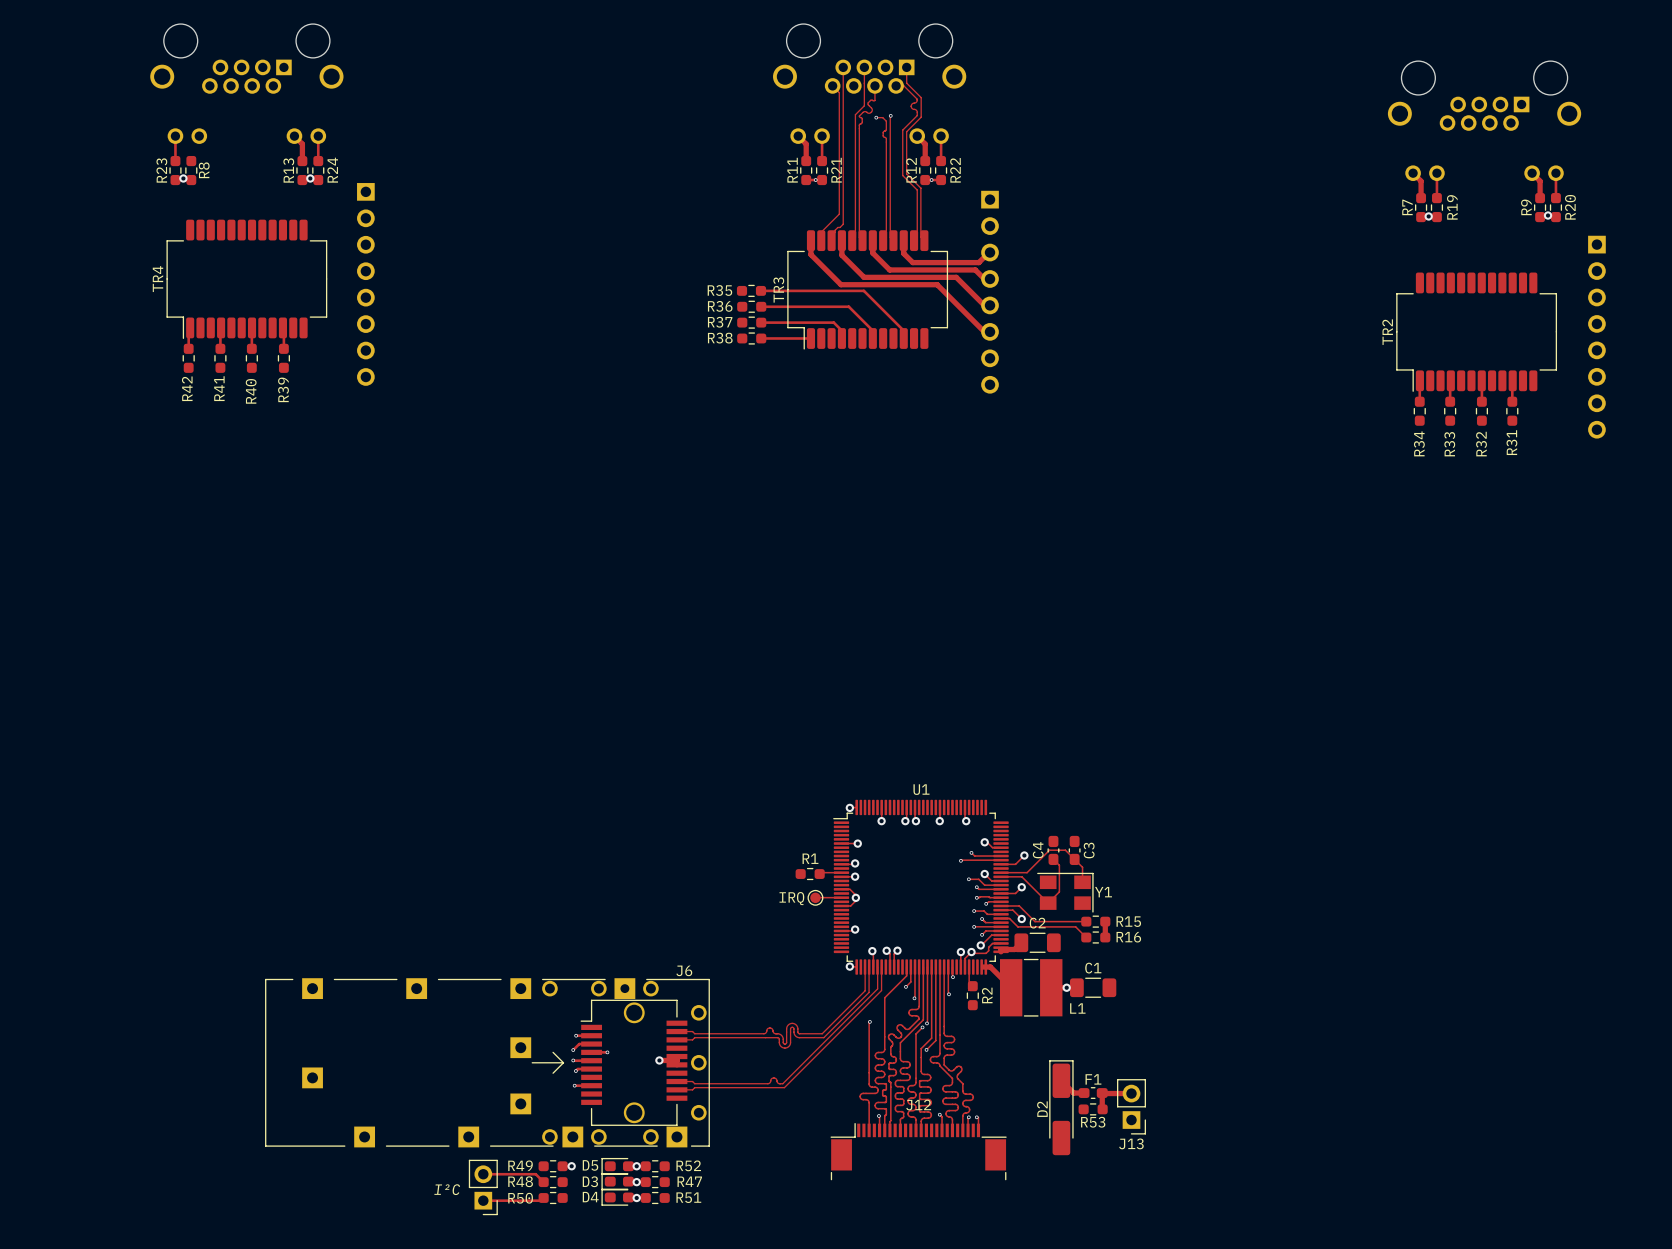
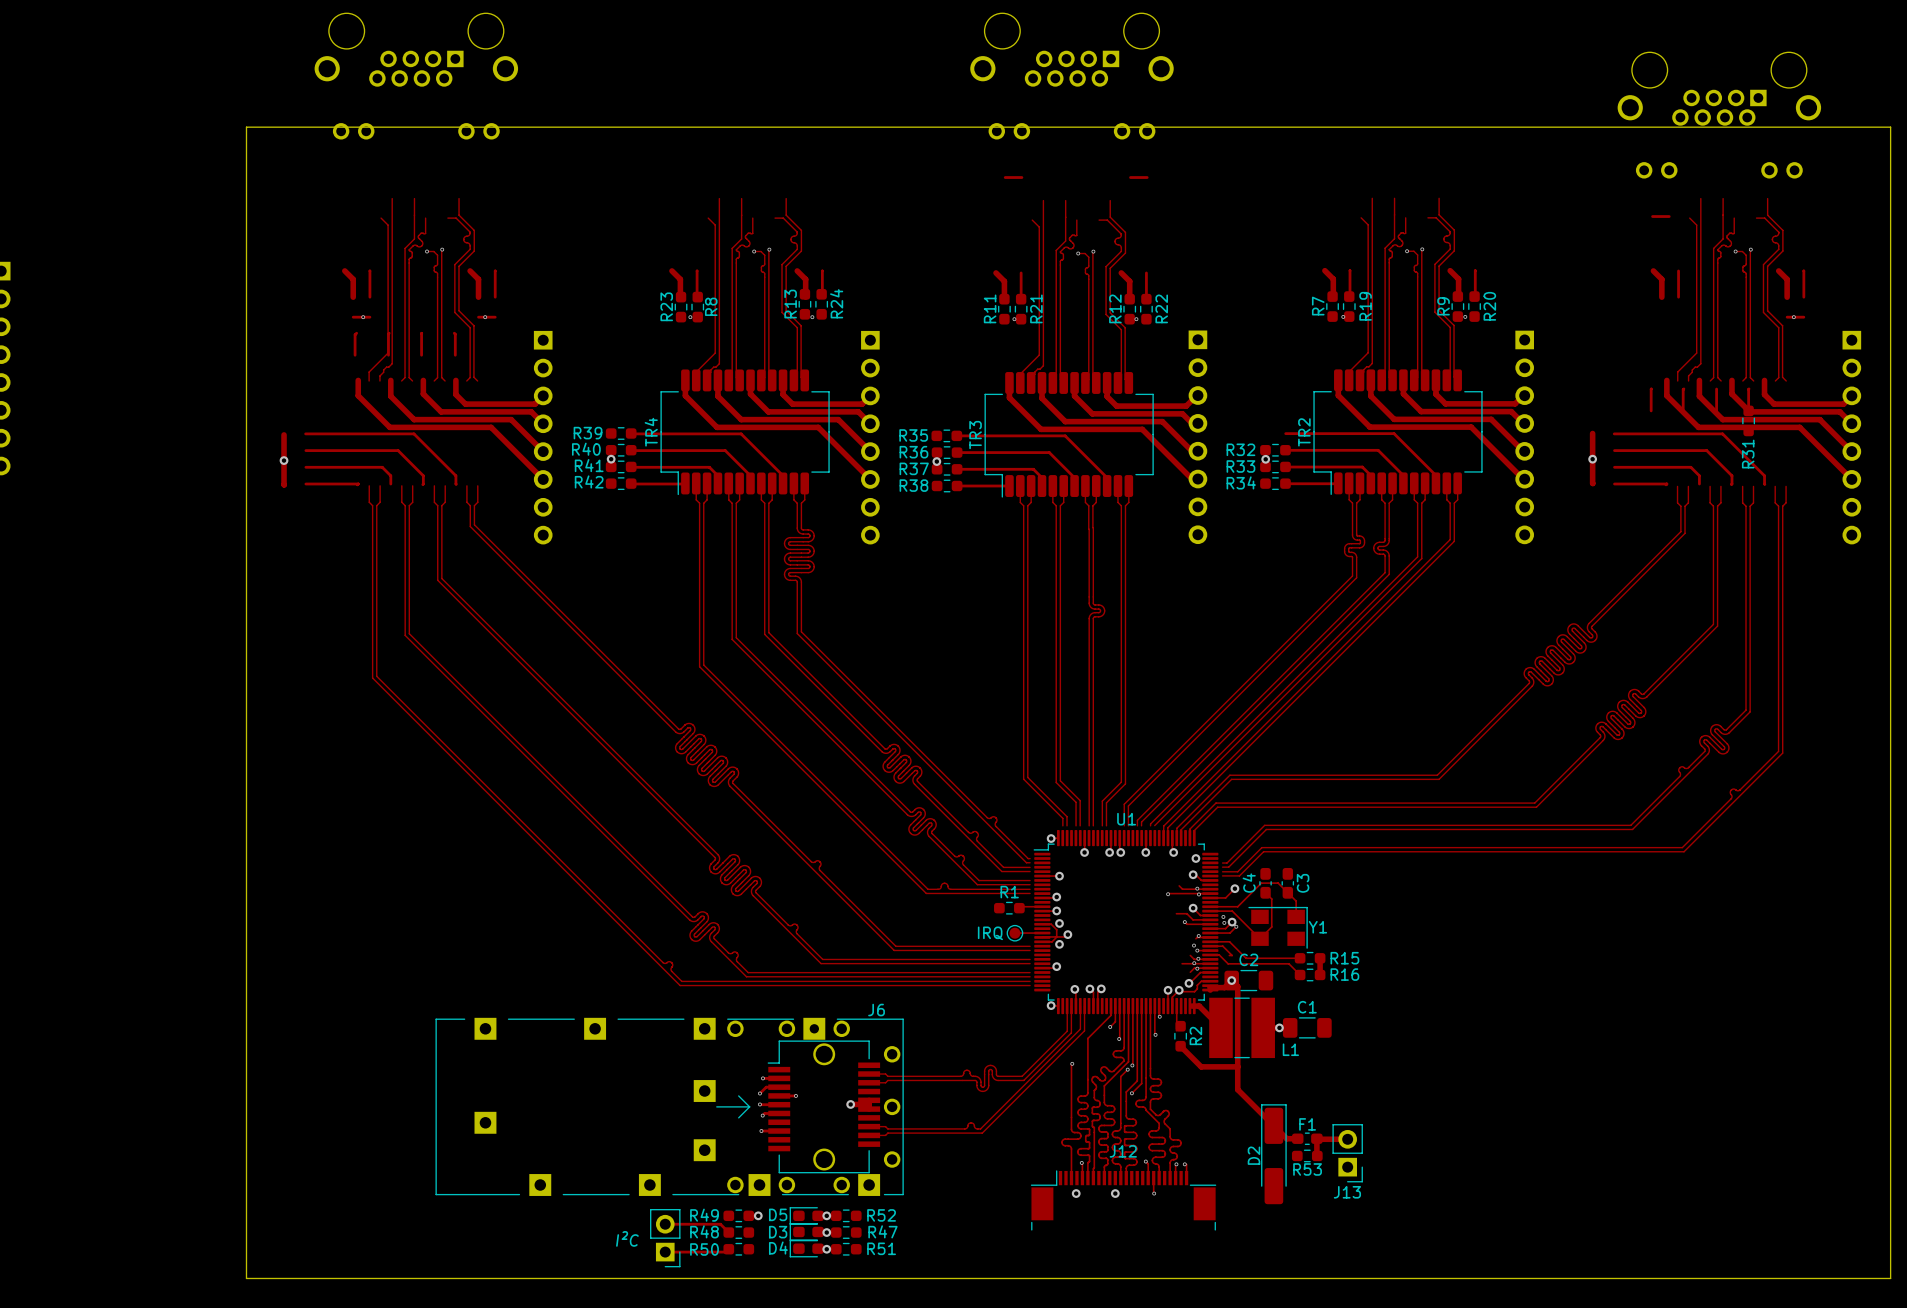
track: (843, 67) (843, 224) (835, 230) (831, 235) (831, 240) -> (1043, 200) (1043, 365) (1034, 372) (1031, 377) (1031, 382)
track: (864, 67) (864, 105) (855, 114) (855, 237) (852, 240) -> (1065, 200) (1065, 241) (1056, 250) (1056, 379) (1052, 382)
track: (906, 67) (906, 83) (921, 97) (921, 117) (906, 131) (906, 173) (920, 188) (920, 237) (924, 240) -> (1110, 200) (1110, 217) (1125, 232) (1125, 253) (1110, 268) (1110, 312) (1125, 327) (1125, 379) (1128, 382)
track: (832, 85) (839, 92) (839, 214) (821, 232) (821, 240) -> (1032, 220) (1039, 227) (1039, 355) (1020, 374) (1020, 382)
track: (874, 85) (874, 100) (870, 100) (867, 103) (871, 111) (869, 113) (863, 111) (859, 116) (862, 119) (862, 122) (859, 125) (859, 237) (862, 240) -> (1076, 220) (1076, 235) (1072, 235) (1069, 238) (1073, 246) (1070, 248) (1065, 247) (1060, 251) (1063, 254) (1063, 259) (1060, 261) (1060, 379) (1063, 382)
track: (896, 85) (903, 85) (917, 99) (911, 106) (916, 110) (917, 115) (902, 130) (902, 175) (917, 190) (917, 237) (914, 240) -> (1099, 220) (1107, 220) (1121, 234) (1115, 241) (1120, 246) (1121, 251) (1106, 266) (1106, 314) (1121, 329) (1121, 379) (1117, 382)
track: (890, 115) (890, 237) (893, 240) -> (1093, 251) (1092, 379) (1096, 382)
via: (890, 115) -> none
track: (876, 117) (882, 117) (886, 121) (886, 129) (883, 132) (883, 136) (886, 138) (886, 237) (883, 240) -> (1078, 253) (1085, 253) (1088, 257) (1088, 266) (1085, 269) (1085, 273) (1088, 275) (1088, 379) (1085, 382)
via: (876, 117) -> none
board edge: none -> (246, 127) (1890, 127) (1890, 1278) (246, 1278) (246, 127)
track: (175, 136) (175, 161) -> (369, 270) (369, 297)
track: (294, 136) (302, 144) (302, 161) -> (470, 270) (478, 279) (478, 297)
track: (318, 136) (318, 161) -> (495, 270) (495, 297)
track: (798, 136) (806, 144) (806, 161) -> (996, 272) (1004, 281) (1004, 299)
track: (822, 136) (822, 161) -> (1021, 272) (1021, 299)
track: (917, 136) (925, 144) (925, 161) -> (1121, 272) (1129, 281) (1129, 299)
track: (941, 136) (941, 161) -> (1146, 272) (1146, 299)
R23 position: (175, 170) -> (681, 307)
R8 position: (191, 170) -> (697, 307)
R13 position: (302, 170) -> (804, 304)
R24 position: (318, 170) -> (821, 304)
R11 position: (806, 170) -> (1004, 309)
R21 position: (822, 170) -> (1021, 309)
R12 position: (925, 170) -> (1129, 309)
R22 position: (941, 170) -> (1146, 309)
track: (1413, 173) (1421, 181) (1421, 198) -> (1653, 270) (1661, 279) (1661, 297)
track: (1436, 173) (1436, 198) -> (1678, 270) (1678, 297)
track: (1532, 173) (1540, 181) (1540, 198) -> (1778, 270) (1787, 279) (1787, 297)
track: (1555, 173) (1555, 198) -> (1803, 270) (1803, 297)
via: (183, 178) -> none
via: (310, 178) -> none
via: (815, 180) -> none
via: (931, 180) -> none
track: none -> (1372, 198) (1372, 363) (1363, 369) (1360, 375) (1360, 380)
track: none -> (1394, 198) (1394, 238) (1385, 248) (1385, 377) (1381, 380)
track: none -> (1439, 198) (1439, 214) (1454, 230) (1454, 250) (1439, 266) (1439, 310) (1454, 325) (1454, 377) (1457, 380)
track: none -> (392, 198) (392, 363) (383, 370) (379, 375) (379, 380)
track: none -> (414, 198) (414, 239) (405, 248) (405, 377) (401, 380)
track: none -> (459, 198) (459, 215) (474, 230) (474, 251) (458, 266) (458, 310) (473, 325) (473, 377) (477, 380)
track: none -> (719, 198) (719, 363) (710, 370) (707, 375) (707, 380)
track: none -> (741, 198) (741, 215)
track: none -> (786, 198) (786, 215) (801, 230) (801, 251) (786, 266) (786, 310) (801, 325) (801, 377) (804, 380)
track: none -> (1700, 198) (1700, 363) (1692, 370) (1688, 375) (1688, 380)
track: none -> (1723, 198) (1723, 239) (1713, 248) (1713, 377) (1710, 380)
track: none -> (1767, 198) (1767, 215) (1782, 230) (1782, 251) (1767, 266) (1767, 310) (1782, 325) (1782, 377) (1786, 380)
R7 position: (1421, 207) -> (1332, 306)
R19 position: (1436, 207) -> (1349, 306)
R9 position: (1540, 207) -> (1457, 306)
R20 position: (1555, 207) -> (1474, 306)
track: none -> (741, 215) (741, 239) (732, 248) (732, 377) (728, 380)
via: (1548, 215) -> none
via: (1428, 216) -> none
track: none -> (381, 218) (388, 225) (388, 353) (369, 372) (369, 380)
track: none -> (425, 218) (425, 233) (421, 233) (418, 236) (422, 245) (419, 246) (413, 245) (409, 249) (412, 252) (412, 257) (409, 259) (409, 377) (412, 380)
track: none -> (447, 218) (456, 218) (470, 232) (463, 239) (469, 244) (470, 249) (454, 264) (454, 312) (470, 327) (470, 377) (466, 380)
track: none -> (708, 218) (715, 225) (715, 353) (696, 372) (696, 380)
track: none -> (752, 218) (752, 233) (748, 233) (745, 236) (749, 245) (746, 246) (741, 245) (736, 249) (739, 252) (739, 257) (736, 259) (736, 377) (739, 380)
track: none -> (775, 218) (783, 218) (797, 232) (790, 239) (796, 244) (797, 249) (782, 264) (782, 312) (797, 327) (797, 377) (793, 380)
track: none -> (1361, 217) (1368, 224) (1368, 352) (1349, 371) (1349, 380)
track: none -> (1405, 217) (1405, 233) (1401, 232) (1398, 236) (1402, 244) (1399, 246) (1394, 245) (1389, 249) (1392, 252) (1392, 256) (1389, 259) (1389, 377) (1392, 380)
track: none -> (1427, 217) (1436, 217) (1450, 231) (1443, 239) (1449, 244) (1450, 249) (1434, 264) (1434, 312) (1450, 327) (1450, 377) (1446, 380)
track: none -> (1689, 218) (1696, 225) (1696, 353) (1677, 372) (1677, 380)
track: none -> (1734, 218) (1734, 233) (1730, 233) (1726, 236) (1731, 245) (1728, 246) (1722, 245) (1717, 249) (1720, 252) (1720, 257) (1717, 259) (1717, 377) (1721, 380)
track: none -> (1756, 218) (1764, 218) (1778, 232) (1772, 239) (1778, 244) (1778, 249) (1763, 264) (1763, 312) (1778, 327) (1778, 377) (1775, 380)
track: (810, 240) (810, 254) (841, 284) (937, 284) (986, 334) -> (1009, 382) (1009, 397) (1041, 429) (1142, 429) (1194, 481)
track: (841, 240) (841, 255) (864, 277) (956, 277) (986, 307) -> (1041, 382) (1041, 398) (1065, 421) (1162, 421) (1194, 453)
track: (872, 240) (872, 253) (889, 269) (975, 269) (986, 281) -> (1074, 382) (1074, 396) (1092, 413) (1182, 413) (1194, 425)
track: (903, 240) (903, 253) (912, 262) (978, 262) (986, 254) -> (1107, 382) (1107, 396) (1116, 406) (1186, 406) (1194, 397)
track: none -> (442, 249) (441, 377) (445, 380)
via: none -> (442, 249)
track: none -> (769, 249) (768, 377) (772, 380)
via: none -> (769, 249)
track: none -> (1422, 249) (1421, 377) (1425, 380)
via: none -> (1422, 249)
track: none -> (1750, 249) (1750, 377) (1753, 380)
via: none -> (1750, 249)
track: none -> (427, 251) (433, 251) (437, 255) (437, 264) (434, 267) (434, 271) (437, 273) (437, 377) (434, 380)
via: none -> (427, 251)
track: none -> (754, 251) (760, 251) (764, 255) (764, 264) (761, 267) (761, 271) (764, 273) (764, 377) (761, 380)
via: none -> (754, 251)
via: none -> (1093, 251)
track: none -> (1407, 251) (1413, 251) (1417, 255) (1417, 264) (1414, 267) (1414, 271) (1417, 273) (1417, 377) (1414, 380)
via: none -> (1407, 251)
track: none -> (1735, 251) (1742, 251) (1746, 255) (1746, 264) (1742, 267) (1743, 271) (1746, 273) (1746, 377) (1742, 380)
via: none -> (1735, 251)
via: none -> (1078, 253)
track: none -> (344, 270) (353, 279) (353, 297)
track: none -> (671, 270) (680, 279) (680, 297)
track: none -> (697, 270) (697, 297)
track: none -> (797, 270) (805, 279) (805, 297)
track: none -> (822, 270) (822, 297)
track: none -> (1324, 270) (1333, 279) (1333, 296)
track: none -> (1350, 270) (1350, 296)
track: none -> (1450, 270) (1458, 279) (1458, 296)
track: none -> (1475, 270) (1475, 296)
TR4 position: (246, 279) -> (745, 432)
part position: (365, 284) -> (543, 437)
TR3 position: (867, 289) -> (1069, 434)
R35 position: (751, 290) -> (946, 435)
track: (761, 290) (863, 290) (903, 330) (904, 338) -> (956, 435) (1065, 435) (1107, 477) (1107, 486)
part position: (990, 292) -> (1197, 437)
R36 position: (751, 306) -> (947, 452)
track: (761, 306) (848, 306) (872, 330) (872, 339) -> (957, 452) (1049, 452) (1074, 477) (1074, 486)
track: none -> (353, 317) (369, 317)
via: none -> (363, 317)
track: none -> (478, 317) (495, 317)
via: none -> (485, 317)
via: none -> (690, 317)
via: none -> (812, 317)
via: none -> (1343, 316)
via: none -> (1465, 316)
track: none -> (1787, 317) (1803, 317)
via: none -> (1793, 317)
via: none -> (1014, 319)
via: none -> (1136, 319)
R37 position: (751, 322) -> (947, 469)
track: (761, 322) (833, 322) (841, 330) (841, 338) -> (957, 469) (1033, 469) (1042, 477) (1042, 486)
TR2 position: (1476, 332) -> (1397, 432)
part position: (1596, 337) -> (1851, 437)
R38 position: (751, 338) -> (947, 486)
track: (761, 338) (810, 338) -> none
R42 rotation: 0° (188, 358) -> 90° clockwise (621, 483)
R42 position: (188, 358) -> (621, 483)
R41 rotation: 0° (220, 358) -> 90° clockwise (621, 466)
R41 position: (220, 358) -> (621, 466)
R40 rotation: 0° (251, 358) -> 90° clockwise (621, 450)
R40 position: (251, 358) -> (621, 450)
R39 rotation: 0° (283, 358) -> 90° clockwise (621, 433)
R39 position: (283, 358) -> (621, 433)
track: none -> (358, 380) (358, 395) (389, 427) (491, 427) (543, 479)
track: none -> (390, 380) (390, 396) (414, 419) (511, 419) (543, 451)
track: none -> (423, 380) (423, 394) (441, 411) (531, 411) (543, 423)
track: none -> (455, 380) (455, 394) (465, 404) (535, 404) (543, 395)
track: none -> (685, 380) (685, 395) (717, 427) (818, 427) (870, 479)
track: none -> (717, 380) (717, 396) (741, 419) (838, 419) (870, 451)
track: none -> (750, 380) (750, 394) (768, 411) (858, 411) (870, 423)
track: none -> (783, 380) (783, 394) (792, 404) (862, 404) (870, 395)
track: none -> (1338, 380) (1338, 395) (1369, 427) (1471, 427) (1523, 479)
track: none -> (1370, 380) (1370, 396) (1394, 419) (1491, 419) (1523, 451)
track: none -> (1403, 380) (1403, 393) (1421, 411) (1511, 411) (1523, 423)
track: none -> (1435, 380) (1435, 394) (1445, 403) (1515, 403) (1523, 395)
track: none -> (1666, 380) (1666, 395) (1698, 427) (1799, 427) (1851, 479)
track: none -> (1699, 380) (1699, 396) (1722, 419) (1819, 419) (1851, 451)
track: none -> (1731, 380) (1731, 394) (1749, 411) (1839, 411) (1851, 423)
track: none -> (1764, 380) (1764, 394) (1774, 404) (1843, 404) (1851, 395)
R34 rotation: 0° (1419, 411) -> 90° clockwise (1275, 483)
R34 position: (1419, 411) -> (1275, 483)
R33 rotation: 0° (1450, 411) -> 90° clockwise (1275, 466)
R33 position: (1450, 411) -> (1275, 466)
R32 rotation: 0° (1481, 411) -> 90° clockwise (1275, 450)
R32 position: (1481, 411) -> (1275, 450)
track: none -> (305, 433) (413, 433) (455, 475) (456, 484)
track: none -> (632, 433) (741, 433) (783, 475) (783, 484)
track: none -> (1285, 433) (1394, 433) (1436, 475) (1436, 484)
track: none -> (1592, 433) (1592, 483)
track: none -> (1614, 433) (1722, 433) (1764, 475) (1764, 484)
track: none -> (284, 434) (284, 485)
part: none -> (1524, 437)
part: none -> (870, 437)
track: none -> (305, 450) (398, 450) (423, 475) (422, 484)
track: none -> (633, 450) (725, 450) (750, 475) (749, 484)
track: none -> (1285, 450) (1378, 450) (1403, 475) (1402, 484)
track: none -> (1614, 450) (1706, 450) (1731, 475) (1731, 484)
via: none -> (611, 459)
via: none -> (1265, 459)
via: none -> (1592, 459)
via: none -> (284, 460)
via: none -> (936, 461)
track: none -> (305, 467) (382, 467) (390, 475) (390, 484)
track: none -> (633, 467) (709, 467) (717, 475) (717, 484)
track: none -> (1285, 467) (1362, 467) (1370, 475) (1370, 483)
track: none -> (1614, 467) (1690, 467) (1699, 475) (1699, 484)
track: none -> (696, 483) (696, 499) (699, 503) (699, 666) (926, 893) (1030, 893)
track: none -> (707, 483) (707, 499) (703, 503) (703, 665) (928, 889) (939, 889) (944, 883) (950, 889) (1030, 889)
track: none -> (728, 483) (728, 499) (732, 503) (732, 639) (907, 814) (912, 816) (920, 812) (920, 814) (909, 826) (911, 833) (917, 834) (931, 823) (927, 831) (928, 836) (977, 884) (1030, 884)
track: none -> (739, 483) (739, 499) (736, 503) (736, 637) (910, 811) (918, 807) (923, 809) (924, 815) (913, 828) (913, 830) (927, 819) (933, 820) (936, 825) (932, 833) (954, 856) (963, 856) (963, 864) (979, 880) (1030, 880)
track: none -> (761, 483) (761, 499) (764, 503) (764, 634) (881, 751) (886, 753) (895, 749) (895, 751) (883, 763) (885, 770) (891, 771) (903, 759) (906, 759) (906, 762) (894, 774) (896, 781) (902, 782) (917, 770) (913, 778) (914, 783) (1001, 871) (1030, 871)
track: none -> (772, 483) (772, 499) (768, 503) (768, 632) (885, 748) (892, 744) (898, 746) (899, 752) (887, 765) (887, 767) (890, 767) (902, 755) (909, 757) (910, 763) (898, 776) (898, 778) (901, 778) (912, 767) (919, 767) (921, 772) (917, 781) (968, 832) (977, 832) (977, 841) (1003, 867) (1030, 867)
track: none -> (793, 483) (793, 499) (797, 503) (797, 529) (800, 533) (810, 535) (808, 537) (788, 537) (784, 542) (788, 549) (810, 551) (808, 553) (788, 553) (784, 558) (788, 564) (810, 566) (808, 568) (788, 568) (784, 573) (787, 579) (797, 581) (797, 633) (1026, 862) (1030, 862)
track: none -> (804, 483) (804, 499) (801, 503) (801, 528) (811, 531) (813, 537) (809, 541) (790, 541) (788, 543) (790, 545) (809, 545) (814, 550) (809, 556) (788, 558) (790, 560) (809, 560) (814, 565) (809, 572) (788, 574) (789, 576) (798, 577) (801, 580) (801, 631) (987, 817) (995, 817) (995, 826) (1030, 858)
track: none -> (1285, 483) (1337, 484)
track: none -> (1349, 483) (1349, 499) (1352, 503) (1352, 536) (1354, 539) (1360, 540) (1359, 543) (1348, 543) (1344, 547) (1345, 554) (1352, 557) (1352, 576) (1124, 804) (1124, 825)
track: none -> (1360, 483) (1360, 499) (1356, 503) (1356, 535) (1363, 537) (1364, 543) (1361, 547) (1348, 548) (1349, 552) (1354, 553) (1356, 556) (1356, 577) (1128, 806) (1128, 825)
track: none -> (1381, 483) (1381, 499) (1385, 503) (1385, 540) (1376, 543) (1373, 548) (1376, 553) (1384, 555) (1385, 572) (1137, 820) (1137, 825)
track: none -> (1392, 483) (1392, 499) (1389, 503) (1389, 542) (1386, 545) (1377, 548) (1388, 553) (1389, 574) (1141, 822) (1141, 825)
track: none -> (1414, 483) (1414, 499) (1417, 503) (1417, 556) (1150, 825)
track: none -> (1425, 483) (1425, 499) (1421, 503) (1421, 558) (1154, 825)
track: none -> (1446, 483) (1446, 499) (1450, 503) (1450, 539) (1163, 826) (1163, 831)
track: none -> (1457, 483) (1457, 499) (1454, 503) (1454, 541) (1167, 827) (1167, 831)
track: none -> (305, 484) (357, 484)
track: none -> (633, 484) (684, 484)
track: none -> (1614, 484) (1666, 484)
track: none -> (369, 485) (369, 502) (372, 505) (372, 678) (680, 985) (1030, 985)
track: none -> (380, 485) (380, 502) (376, 505) (376, 676) (662, 962) (671, 962) (671, 970) (681, 981) (1030, 981)
track: none -> (401, 485) (401, 502) (405, 505) (405, 635) (689, 919) (695, 921) (703, 916) (703, 918) (690, 932) (692, 939) (699, 940) (714, 927) (714, 929) (709, 935) (710, 940) (746, 976) (1030, 976)
track: none -> (412, 485) (412, 502) (409, 505) (409, 633) (692, 916) (700, 912) (706, 913) (707, 920) (694, 934) (694, 936) (710, 923) (716, 923) (719, 929) (714, 938) (728, 953) (737, 953) (736, 961) (748, 972) (1030, 972)
track: none -> (434, 485) (434, 502) (437, 505) (437, 580) (714, 857) (709, 866) (711, 872) (718, 873) (732, 859) (734, 859) (735, 861) (721, 876) (722, 882) (728, 884) (743, 870) (745, 870) (746, 872) (731, 887) (733, 894) (740, 894) (756, 880) (757, 883) (751, 890) (752, 895) (821, 963) (1030, 963)
track: none -> (445, 485) (445, 502) (441, 505) (441, 578) (717, 854) (719, 860) (714, 869) (716, 869) (731, 855) (737, 856) (739, 863) (724, 877) (725, 880) (727, 880) (742, 866) (748, 867) (749, 874) (735, 888) (736, 891) (752, 877) (759, 877) (761, 883) (755, 892) (788, 925) (797, 925) (796, 933) (822, 959) (1030, 959)
track: none -> (466, 485) (466, 502) (470, 505) (470, 526) (675, 731) (681, 733) (688, 727) (690, 728) (676, 744) (677, 751) (684, 753) (698, 738) (701, 739) (701, 741) (687, 756) (688, 762) (695, 764) (709, 749) (712, 749) (712, 752) (698, 767) (699, 773) (705, 774) (720, 760) (723, 760) (723, 763) (708, 777) (710, 784) (716, 785) (731, 771) (733, 771) (728, 780) (730, 786) (894, 950) (1030, 950)
track: none -> (477, 485) (477, 502) (474, 505) (474, 524) (678, 728) (687, 723) (693, 725) (694, 731) (680, 746) (680, 749) (682, 749) (697, 734) (704, 736) (705, 742) (691, 757) (691, 759) (693, 760) (708, 745) (715, 747) (716, 753) (701, 768) (702, 770) (704, 771) (719, 756) (725, 757) (727, 764) (712, 779) (713, 781) (715, 781) (730, 767) (736, 768) (738, 774) (733, 783) (811, 861) (819, 861) (820, 870) (895, 946) (1030, 946)
track: none -> (957, 486) (1008, 486)
track: none -> (1020, 486) (1020, 502) (1023, 505) (1023, 779) (1062, 818) (1062, 825)
track: none -> (1031, 486) (1031, 502) (1027, 505) (1027, 777) (1067, 816) (1067, 825)
track: none -> (1052, 486) (1052, 502) (1056, 505) (1056, 782) (1076, 802) (1076, 825)
track: none -> (1063, 486) (1063, 502) (1060, 505) (1060, 780) (1080, 800) (1080, 825)
track: none -> (1085, 486) (1085, 502) (1088, 505) (1089, 603) (1092, 608) (1100, 610) (1091, 613) (1089, 618) (1089, 825)
track: none -> (1096, 486) (1096, 502) (1092, 505) (1093, 603) (1101, 605) (1104, 610) (1102, 615) (1093, 618) (1093, 825)
track: none -> (1117, 486) (1117, 502) (1121, 505) (1121, 782) (1102, 801) (1102, 825)
track: none -> (1128, 486) (1128, 502) (1125, 505) (1125, 783) (1106, 802) (1106, 825)
track: none -> (1677, 486) (1677, 502) (1680, 506) (1680, 531) (1588, 623) (1587, 628) (1592, 637) (1576, 624) (1569, 626) (1568, 632) (1581, 646) (1581, 648) (1565, 635) (1558, 636) (1557, 643) (1570, 659) (1568, 659) (1554, 646) (1548, 646) (1546, 654) (1559, 670) (1557, 670) (1544, 657) (1537, 657) (1535, 665) (1548, 680) (1546, 681) (1533, 668) (1526, 668) (1524, 674) (1529, 683) (1437, 775) (1229, 775) (1176, 828) (1176, 831)
track: none -> (1688, 486) (1688, 502) (1685, 506) (1685, 533) (1591, 626) (1596, 634) (1595, 639) (1588, 641) (1574, 628) (1572, 628) (1572, 630) (1585, 644) (1584, 650) (1577, 652) (1563, 639) (1561, 639) (1561, 641) (1574, 655) (1573, 661) (1566, 663) (1550, 650) (1550, 652) (1563, 666) (1562, 672) (1555, 674) (1539, 661) (1539, 663) (1552, 677) (1552, 683) (1544, 685) (1529, 672) (1533, 680) (1532, 685) (1439, 779) (1231, 779) (1181, 831)
track: none -> (1710, 486) (1710, 502) (1713, 506) (1713, 624) (1643, 694) (1635, 689) (1629, 691) (1629, 697) (1641, 710) (1641, 712) (1638, 713) (1626, 700) (1619, 701) (1618, 708) (1630, 723) (1627, 724) (1615, 711) (1609, 712) (1607, 719) (1619, 734) (1616, 734) (1604, 722) (1598, 723) (1595, 728) (1600, 737) (1534, 803) (1215, 803) (1190, 829) (1190, 831)
track: none -> (1720, 486) (1720, 502) (1717, 506) (1717, 626) (1646, 697) (1641, 698) (1633, 694) (1633, 696) (1645, 709) (1644, 715) (1637, 717) (1622, 704) (1622, 707) (1634, 720) (1633, 726) (1626, 727) (1611, 715) (1611, 718) (1623, 730) (1622, 737) (1615, 738) (1600, 726) (1604, 734) (1603, 739) (1536, 807) (1217, 807) (1194, 831)
track: none -> (1742, 486) (1742, 502) (1746, 506) (1746, 710) (1726, 729) (1717, 724) (1711, 727) (1711, 733) (1724, 746) (1724, 749) (1721, 749) (1708, 736) (1701, 736) (1699, 742) (1704, 751) (1688, 768) (1679, 768) (1679, 776) (1630, 825) (1264, 825) (1227, 863) (1222, 863)
track: none -> (1753, 486) (1753, 502) (1750, 506) (1750, 711) (1728, 733) (1723, 734) (1717, 729) (1715, 729) (1728, 745) (1727, 752) (1720, 753) (1704, 740) (1709, 748) (1708, 753) (1632, 829) (1266, 829) (1228, 867) (1222, 867)
track: none -> (1775, 486) (1775, 502) (1778, 506) (1778, 751) (1739, 790) (1731, 790) (1731, 798) (1682, 847) (1261, 847) (1237, 871) (1222, 871)
track: none -> (1786, 486) (1786, 502) (1782, 506) (1782, 753) (1684, 851) (1263, 851) (1239, 875) (1222, 875)
via: none -> (1195, 858)
via: (971, 852) -> none
via: none -> (1197, 888)
via: none -> (1198, 894)
via: (968, 879) -> none
via: none -> (1223, 916)
via: none -> (1059, 923)
via: none -> (1224, 922)
via: none -> (1236, 926)
via: (855, 897) -> none
via: (976, 897) -> none
track: (1001, 897) (976, 897) (979, 897) -> (1210, 933) (1230, 933) (1236, 926)
track: none -> (1067, 934) (1065, 936) (1042, 937)
via: none -> (1067, 934)
via: none -> (1198, 936)
via: (986, 903) -> none
via: none -> (1059, 944)
via: none -> (1194, 945)
track: (974, 911) (984, 911) (988, 914) -> none
via: (974, 911) -> none
via: none -> (1197, 950)
via: (982, 918) -> none
via position: (1021, 918) -> (1231, 980)
via: none -> (1198, 958)
via: (974, 926) -> none
via: none -> (1194, 963)
via: none -> (1197, 968)
via: (982, 934) -> none
track: none -> (1231, 980) (1237, 986) (1237, 1089) (1273, 1125)
track: none -> (1180, 1046) (1201, 1066) (1237, 1066)
track: none -> (1153, 1178) (1154, 1193)
via: none -> (1076, 1193)
via: none -> (1115, 1193)
via: none -> (1154, 1193)

